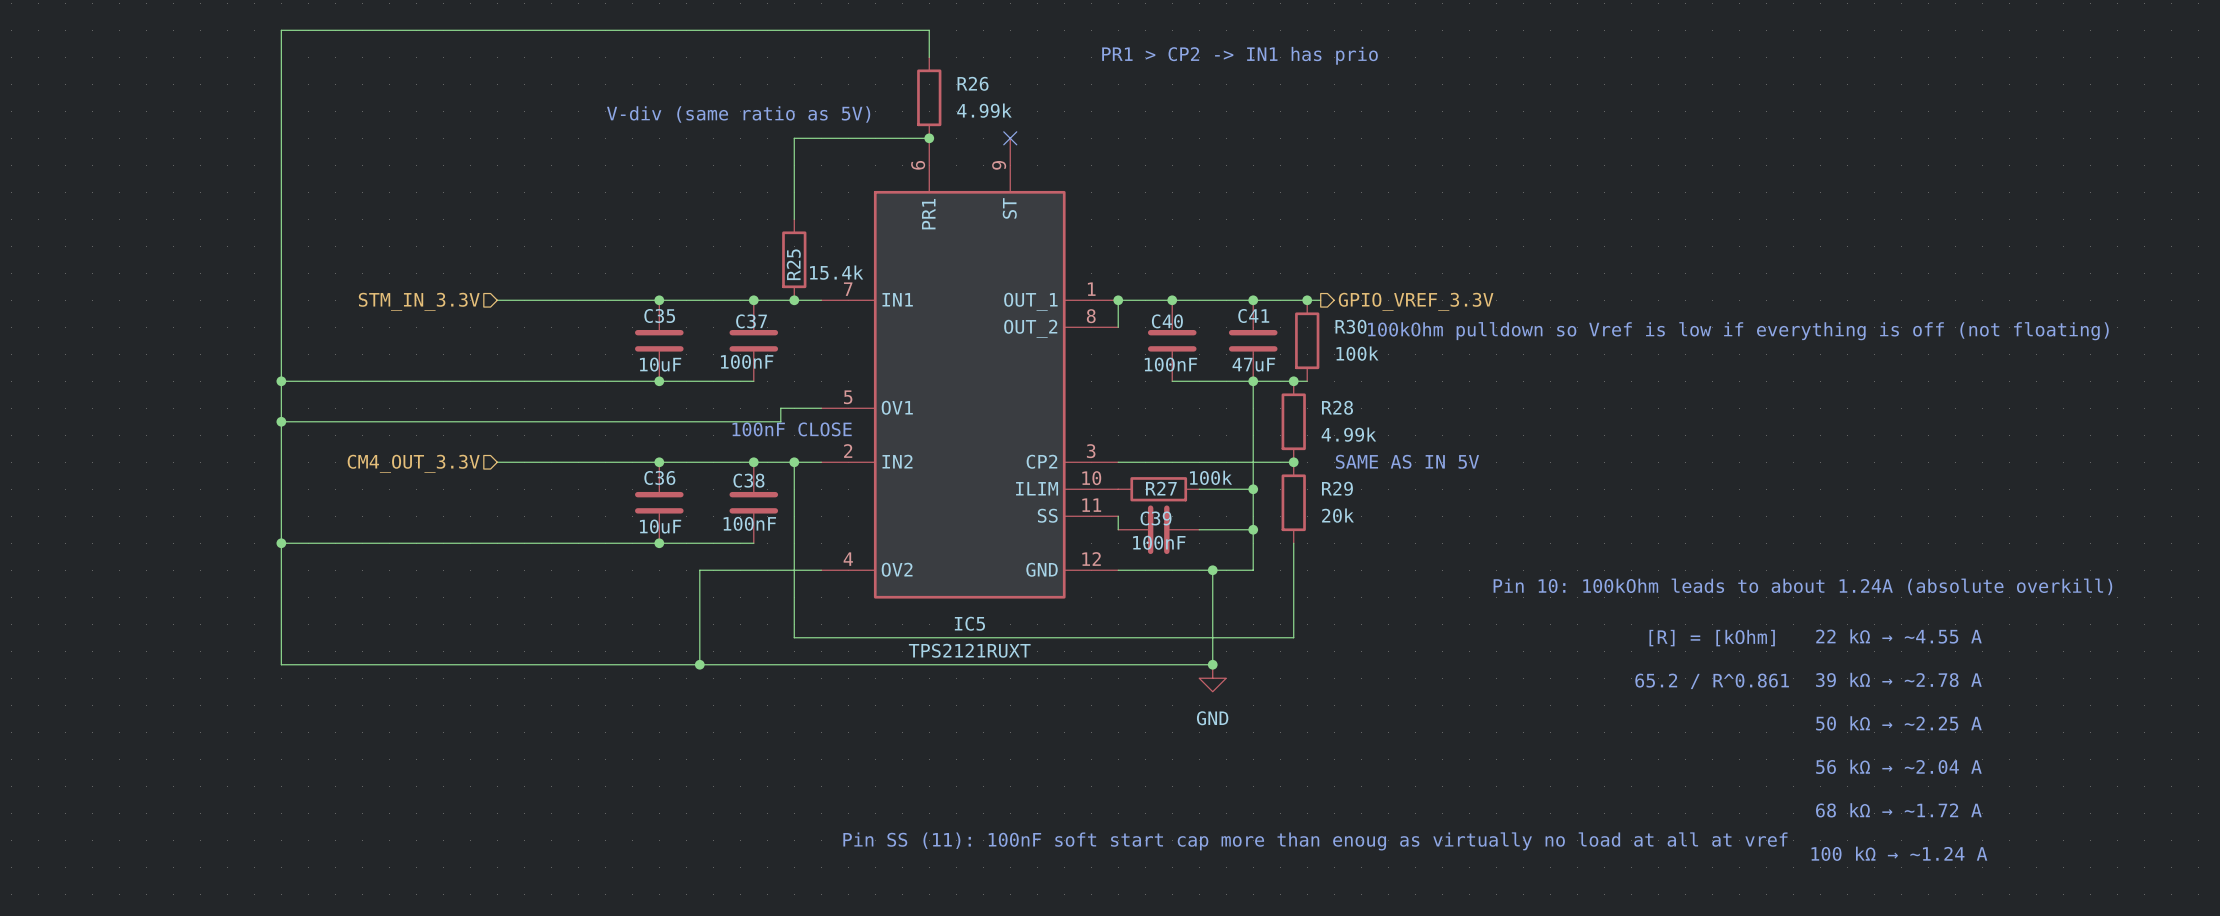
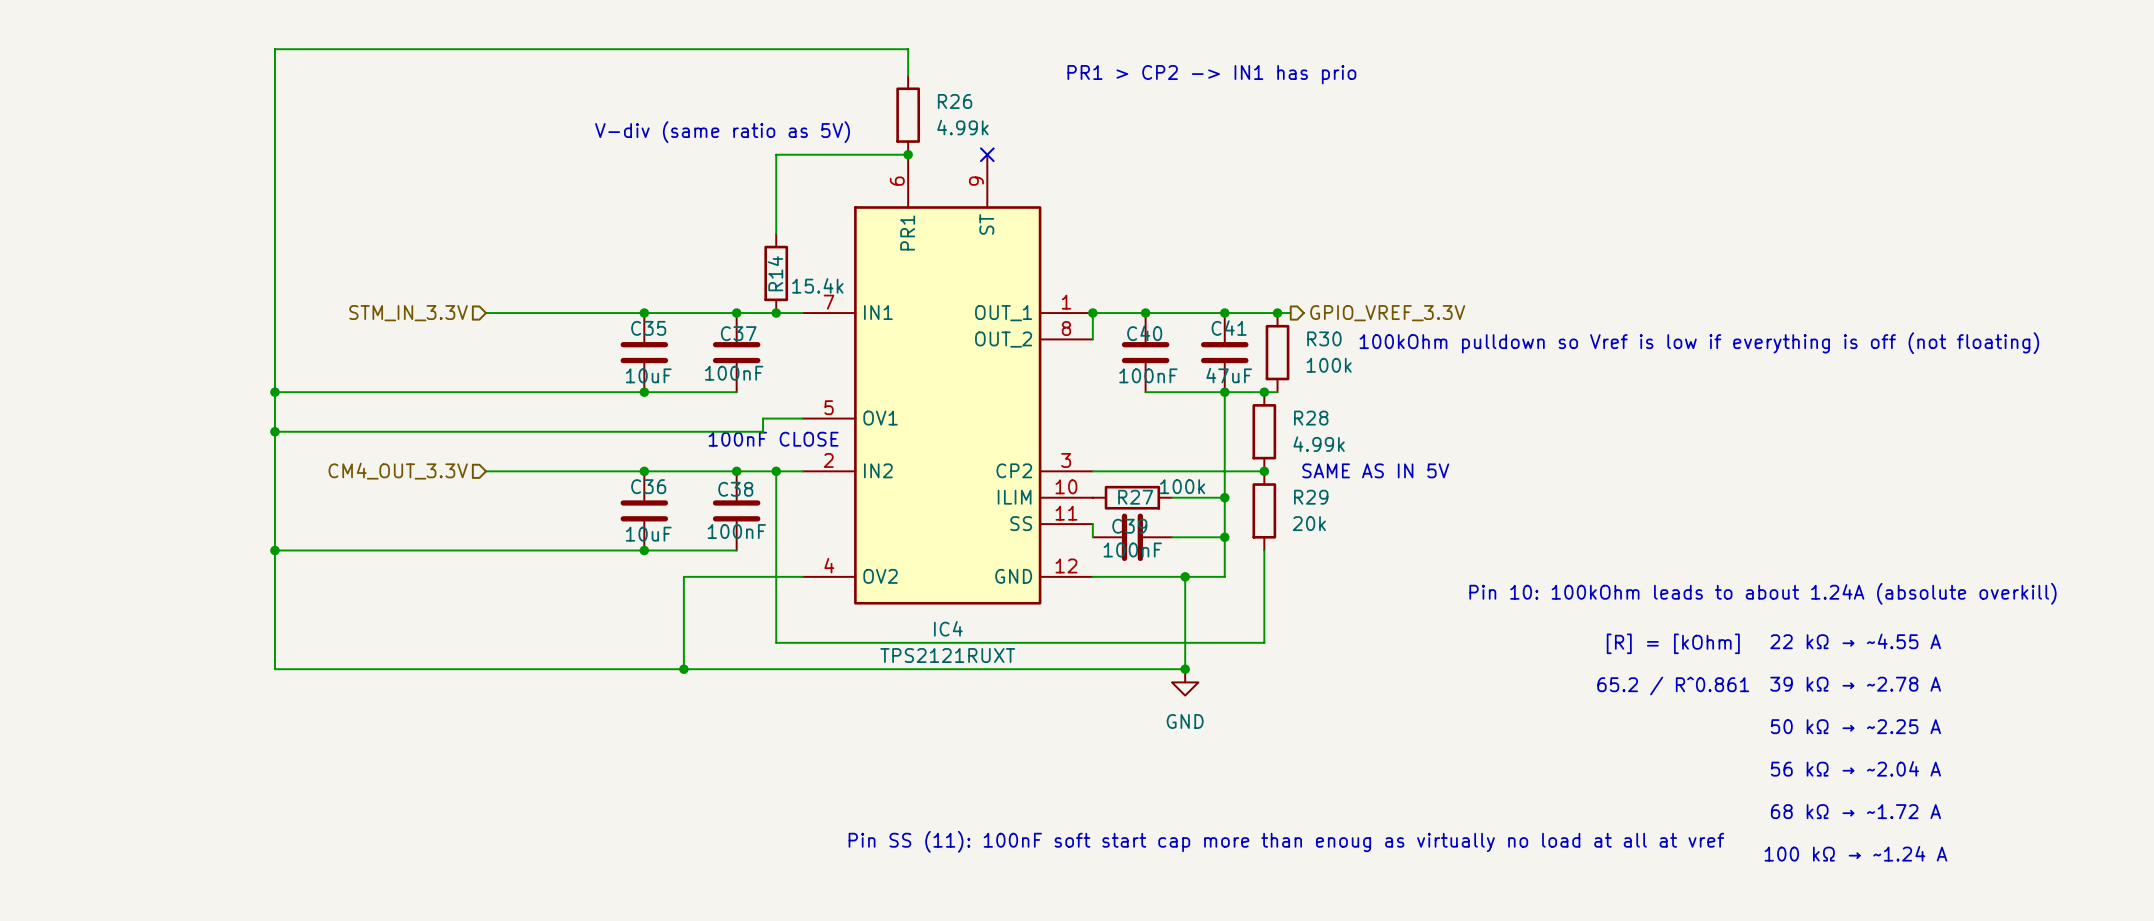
R25 name: R25 (793, 264) -> R14 (775, 273)
IC5 name: IC5 (969, 623) -> IC4 (948, 628)

